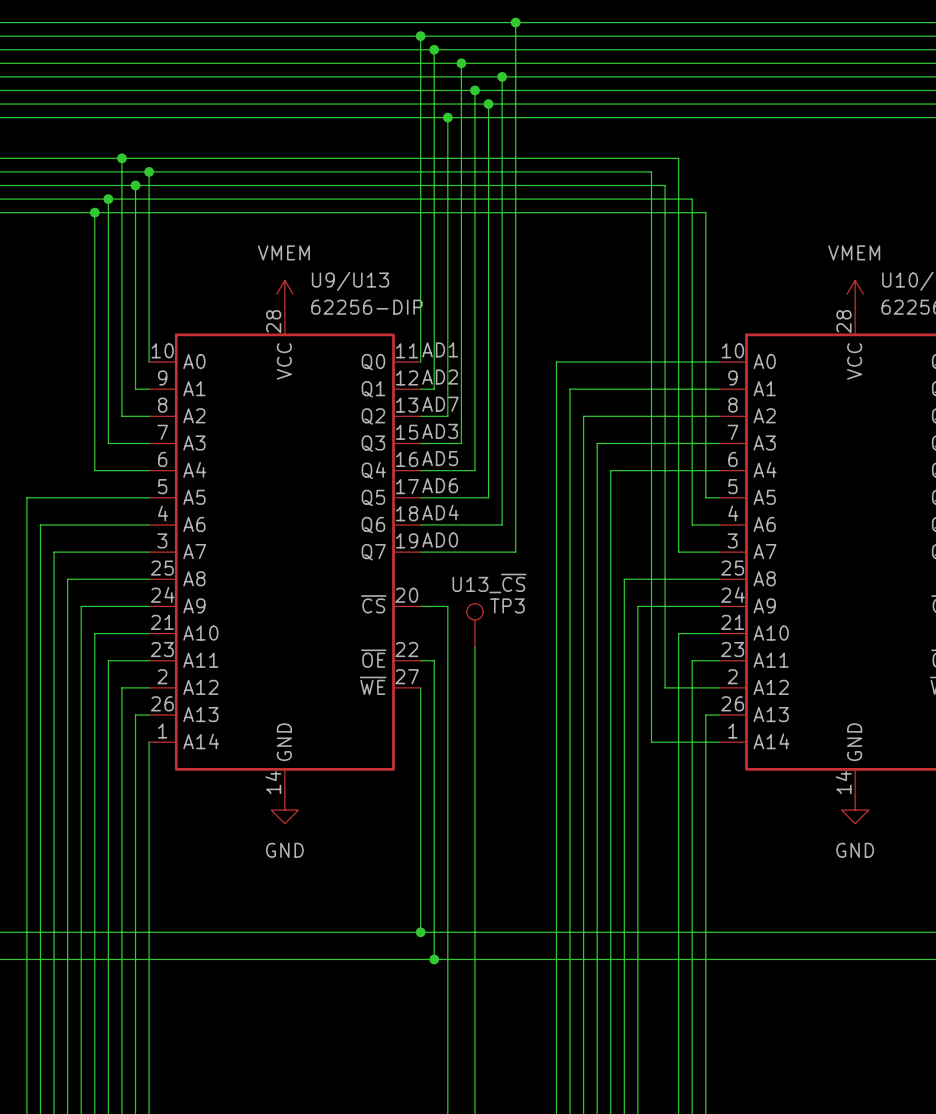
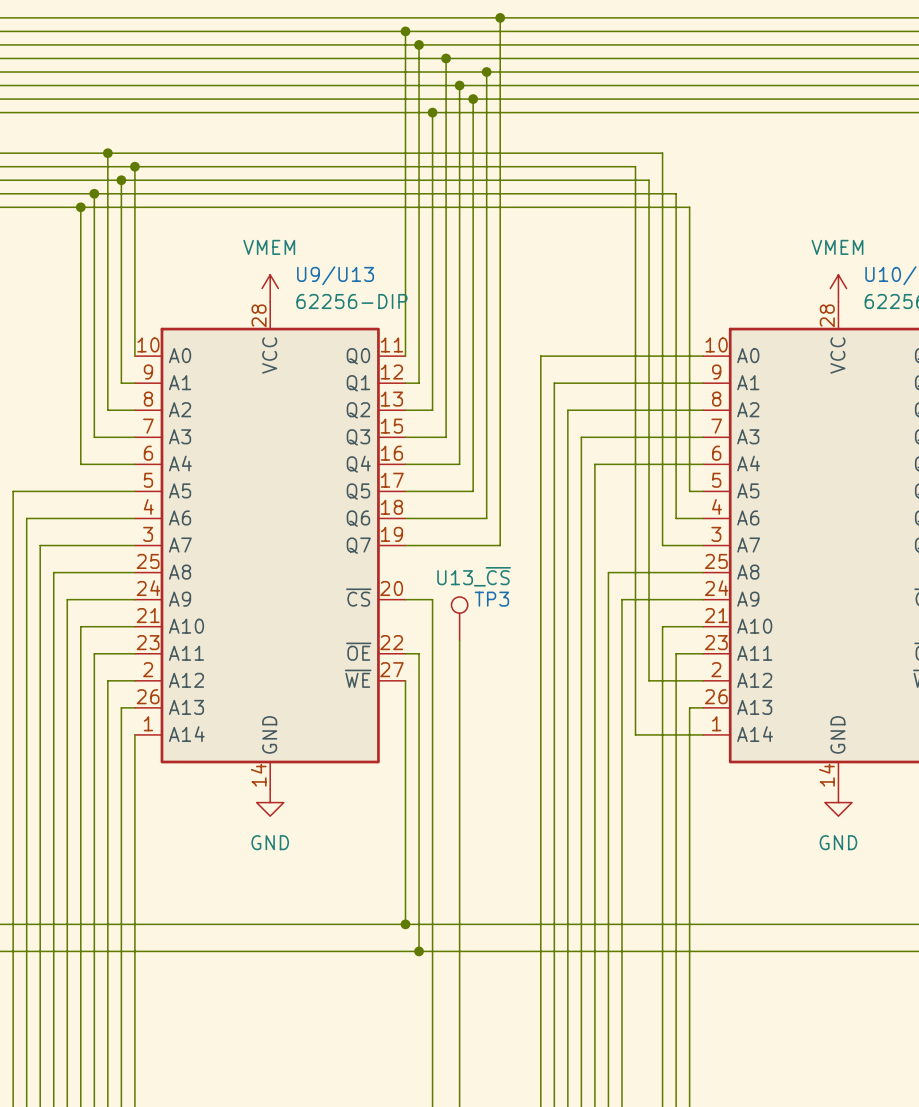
label: AD1 (440, 349) -> none
label: AD2 (440, 377) -> none
label: AD7 (440, 404) -> none
label: AD3 (440, 431) -> none
label: AD5 (440, 458) -> none
label: AD6 (440, 485) -> none
label: AD4 (440, 512) -> none
label: AD0 (440, 540) -> none

